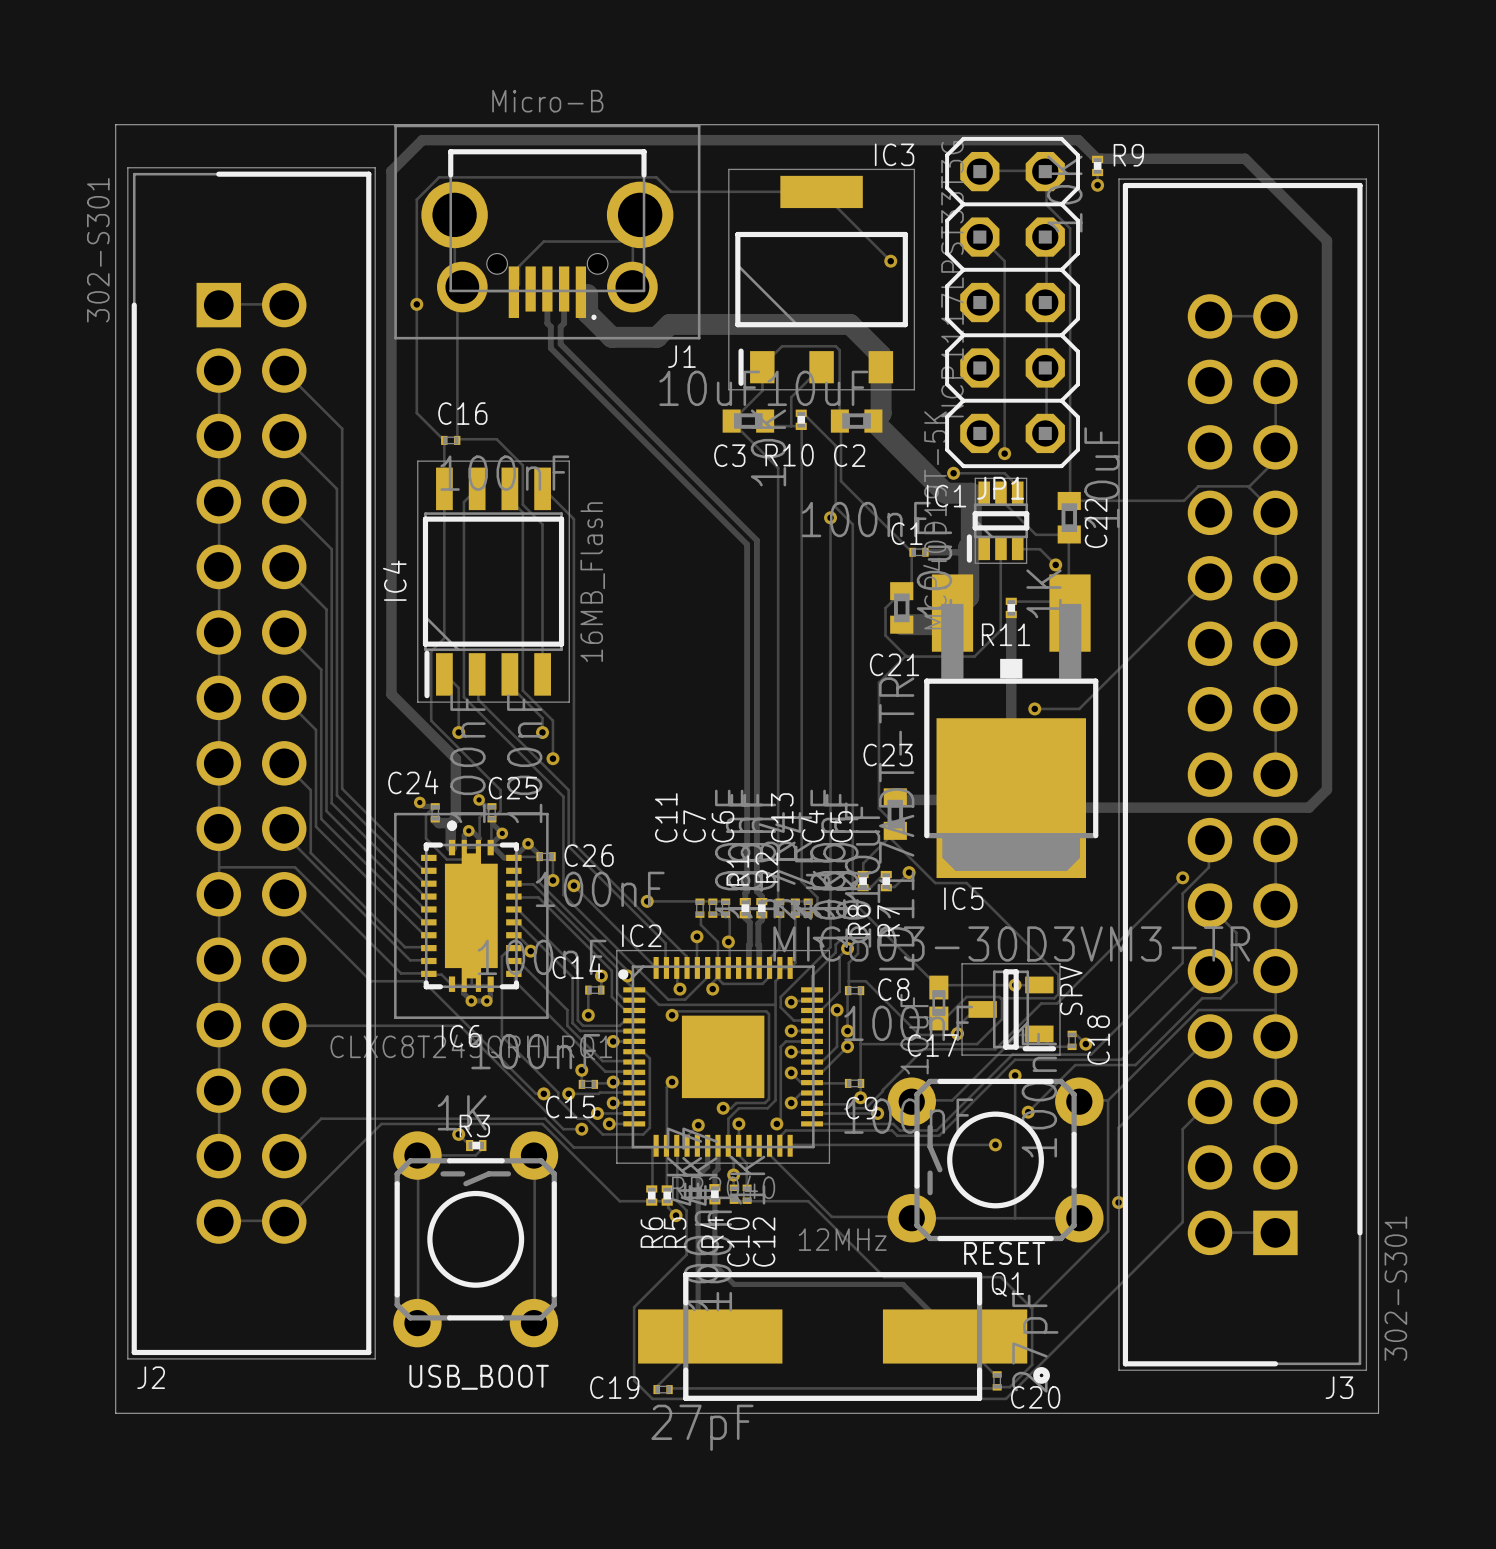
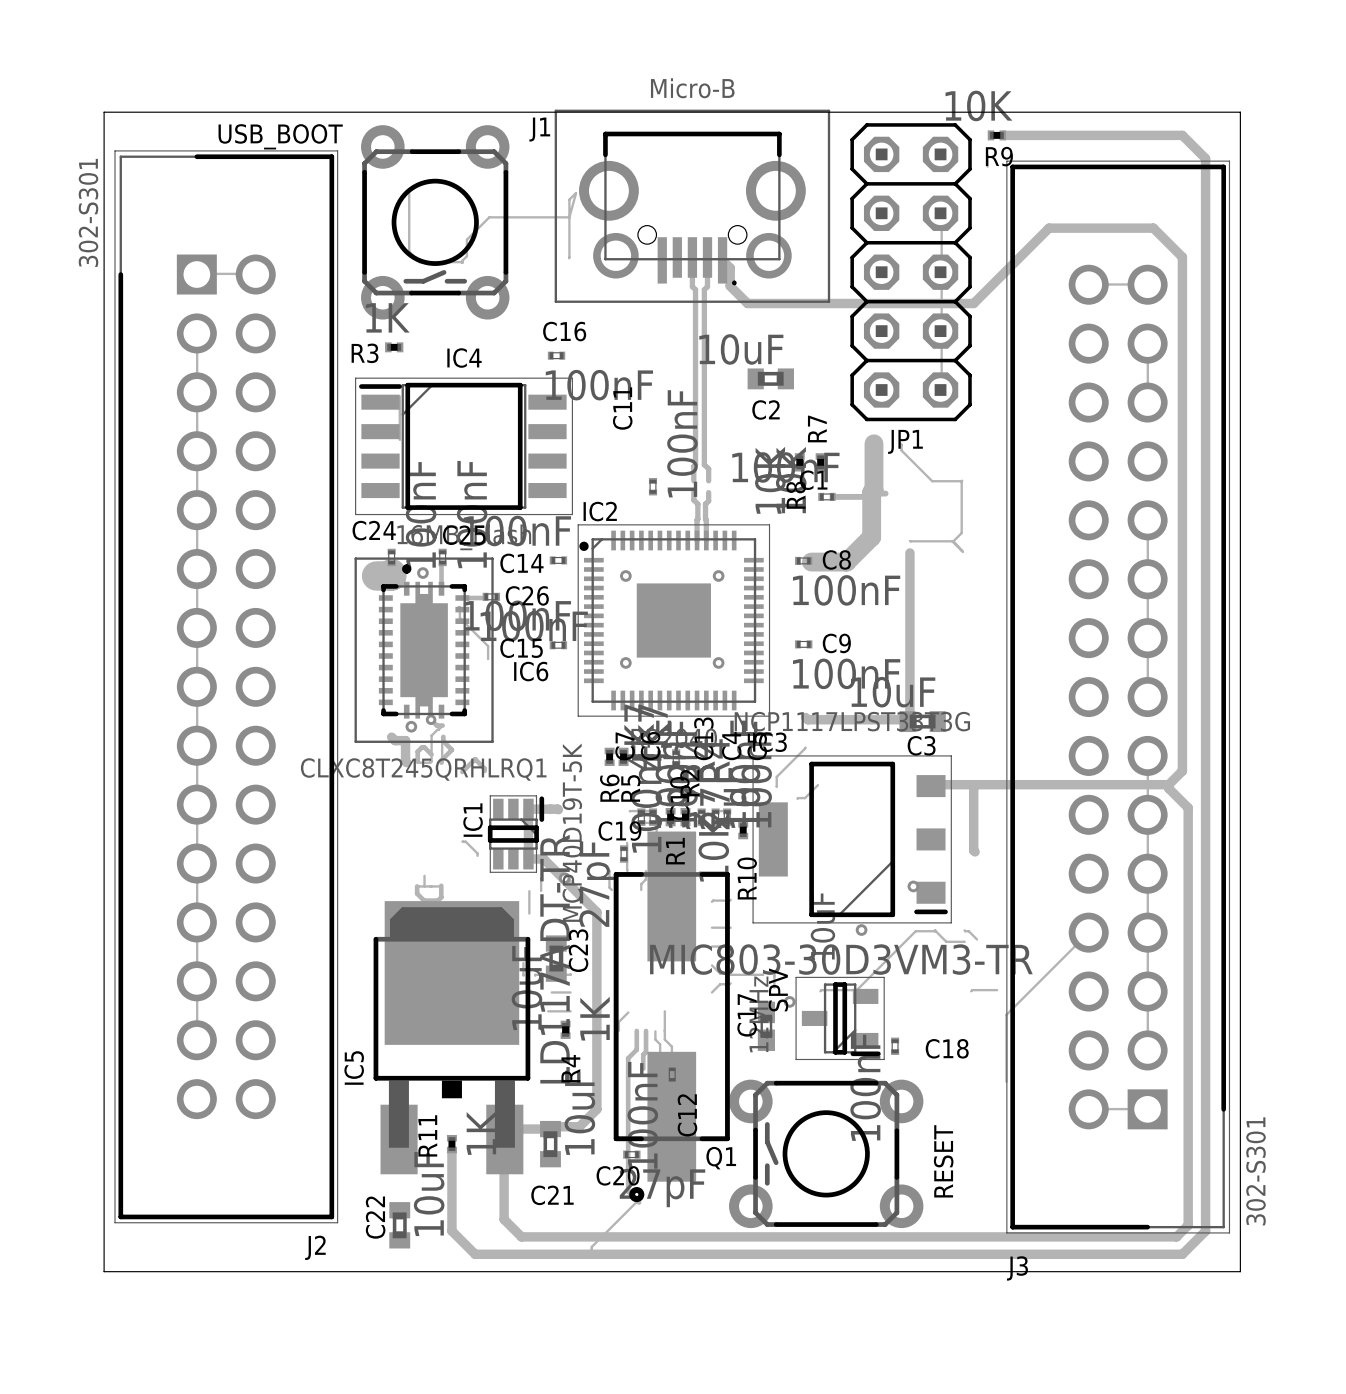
track: none -> (1002, 135) (1182, 135) (1205, 158) (1205, 1231) (1182, 1254) (475, 1254) (451, 1231) (451, 1150)
track: (1097, 158) (1245, 158) (1326, 240) (1326, 789) (1308, 807) (1020, 807) (1011, 798) -> none
track: (1101, 158) (1097, 159) (1078, 140) (422, 140) (391, 171) (391, 694) (455, 758) (455, 817) (450, 823) -> none
R9 rotation: 0° (1097, 165) -> 90° clockwise (996, 135)
R9 position: (1097, 165) -> (996, 135)
track: (979, 171) (1045, 170) (1046, 204) (1070, 228) (1069, 500) (1184, 500) (1198, 486) (1248, 486) (1275, 512) (1275, 578) -> none
via: (1097, 185) -> none
track: (821, 191) (670, 191) (656, 177) (439, 177) (416, 199) (416, 413) (444, 440) -> none
track: (821, 191) (890, 261) -> none
J1 position: (547, 232) -> (692, 206)
track: (979, 237) (1004, 261) (1004, 453) -> none
USB_BOOT: none -> (435, 222)
via: (890, 261) -> none
IC3 rotation: 0° (821, 279) -> 90° counterclockwise (852, 839)
IC3 position: (821, 279) -> (852, 839)
track: none -> (692, 255) (692, 286) (695, 289) (695, 464) (693, 466) (693, 480)
track: none -> (707, 255) (707, 286) (704, 289) (704, 464) (708, 468) (708, 480)
track: (462, 287) (457, 291) (457, 440) (496, 439) (522, 465) (522, 504) (542, 524) (542, 674) -> none
track: (547, 288) (547, 323) (550, 326) (550, 348) (747, 544) (747, 891) (745, 901) -> none
track: (564, 288) (564, 323) (560, 326) (560, 344) (756, 540) (756, 891) (761, 896) (761, 901) -> none
track: none -> (722, 260) (730, 268) (730, 286) (747, 303) (973, 303) (1049, 228) (1153, 228) (1182, 257) (1182, 771) (1168, 784)
track: (580, 292) (587, 294) (587, 313) (611, 337) (656, 337) (669, 324) (850, 324) (880, 355) (880, 367) -> none
via: (416, 304) -> none
J1 name position: J1 (681, 356) -> J1 (539, 129)
track: (821, 367) (791, 397) (791, 426) -> none
track: (881, 367) (881, 413) (873, 421) (945, 493) (984, 493) -> none
track: (284, 370) (342, 428) (342, 788) (423, 869) (428, 870) -> none
track: (801, 413) (835, 445) (835, 507) (852, 524) (852, 901) (938, 987) (937, 985) (1039, 984) -> none
R10 position: (801, 419) -> (743, 830)
track: (839, 420) (839, 350) (835, 346) (782, 346) (762, 365) (762, 390) (731, 421) (778, 468) (778, 898) (779, 901) (795, 901) -> none
C3 position: (748, 421) -> (922, 721)
track: (765, 421) (770, 426) (801, 427) (801, 881) (817, 897) (817, 906) (808, 915) (795, 914) (795, 962) (789, 968) (779, 967) (780, 976) (775, 981) (775, 1100) (767, 1108) (738, 1108) (728, 1118) (728, 1145) -> none
track: (839, 421) (841, 481) (912, 552) (911, 581) (885, 608) (885, 635) (906, 656) (974, 656) (1000, 630) (1000, 548) -> none
track: (284, 436) (336, 488) (336, 795) (424, 883) (428, 883) -> none
C16 position: (450, 440) -> (556, 355)
track: (1275, 447) (1274, 461) (1248, 487) -> none
via: (1004, 453) -> none
C3 name position: C3 (729, 455) -> C3 (921, 745)
R10 name rotation: 0° (789, 455) -> 90° counterclockwise (747, 878)
track: (953, 473) (1004, 473) (1016, 485) (1017, 493) -> none
via: (953, 473) -> none
track: (444, 488) (444, 638) (431, 651) (431, 720) (500, 790) (500, 811) (492, 818) -> none
track: (477, 488) (463, 502) (463, 697) (563, 796) (563, 894) (668, 999) (685, 999) (707, 977) (707, 968) -> none
track: (509, 488) (511, 500) (522, 512) (522, 690) (552, 720) (552, 758) -> none
track: (542, 488) (573, 519) (573, 843) (686, 956) (687, 967) -> none
track: (284, 501) (331, 549) (331, 803) (424, 896) (428, 896) -> none
track: (830, 517) (830, 947) (780, 996) (780, 1007) (793, 1020) (812, 1020) -> none
via: (830, 517) -> none
C22 position: (1069, 517) -> (399, 1225)
IC1 rotation: 0° (998, 520) -> 180° (516, 834)
IC1 position: (998, 520) -> (516, 834)
C22 name position: C22 (1096, 523) -> C22 (375, 1217)
track: none -> (693, 492) (693, 500) (697, 504) (697, 540)
track: none -> (708, 492) (708, 500) (705, 504) (706, 540)
track: (1017, 548) (1040, 549) (1055, 564) -> none
via: (1055, 564) -> none
track: (284, 566) (326, 609) (326, 811) (424, 909) (428, 909) -> none
track: (1209, 578) (1079, 708) (1034, 708) -> none
IC4 rotation: 0° (493, 581) -> 90° clockwise (464, 446)
C21 position: (901, 607) -> (550, 1144)
R11 position: (1011, 607) -> (451, 1144)
track: none -> (442, 563) (441, 588)
track: (284, 632) (321, 669) (321, 818) (424, 922) (428, 922) -> none
R11 name rotation: 0° (1006, 634) -> 90° counterclockwise (427, 1135)
via: none -> (422, 573)
track: none -> (391, 573) (391, 575) (376, 575)
via: none -> (625, 575)
via: none -> (718, 575)
track: (905, 655) (878, 682) (878, 808) (894, 824) (895, 830) (889, 837) (935, 883) (966, 883) (1058, 974) (1058, 994) (1054, 998) (1001, 998) -> none
track: none -> (485, 596) (462, 598)
C21 name position: C21 (894, 664) -> C21 (552, 1195)
track: (444, 674) (458, 687) (458, 732) -> none
track: (477, 674) (478, 699) (568, 790) (568, 846) (665, 943) (666, 967) -> none
track: (284, 697) (316, 729) (316, 826) (423, 934) (428, 935) -> none
via: (1034, 708) -> none
IC5 rotation: 0° (1011, 726) -> 180° (451, 1037)
IC5 position: (1011, 726) -> (451, 1037)
via: (458, 732) -> none
via: (542, 732) -> none
via: none -> (625, 662)
via: none -> (718, 662)
C23 name rotation: 0° (888, 755) -> 90° counterclockwise (578, 950)
via: (552, 758) -> none
track: (284, 763) (310, 790) (310, 852) (405, 947) (428, 948) -> none
track: (419, 802) (423, 806) (435, 806) (425, 814) (425, 838) (446, 859) (471, 858) -> none
via: (419, 802) -> none
via: none -> (411, 726)
C24 position: (435, 812) -> (391, 557)
C25 position: (491, 812) -> (442, 557)
C23 position: (895, 814) -> (556, 958)
track: (284, 828) (284, 834) (410, 960) (428, 961) -> none
via: (468, 830) -> none
via: (502, 833) -> none
track: (1209, 840) (1208, 867) (1182, 893) (1182, 962) (1091, 1054) (1012, 1054) (936, 1130) (899, 1130) (893, 1123) (812, 1123) -> none
via: (528, 843) -> none
track: (490, 847) (493, 847) (504, 857) (539, 856) (538, 881) (627, 970) (627, 982) (634, 989) (644, 990) (659, 1004) (775, 1004) -> none
C26 position: (546, 856) -> (491, 596)
track: (552, 856) (552, 880) -> none
track: (219, 867) (295, 867) (401, 973) (441, 974) (452, 985) (463, 985) -> none
R1 name position: R1 (737, 870) -> R1 (675, 851)
via: (909, 872) -> none
track: none -> (973, 784) (975, 851)
track: none -> (1168, 784) (931, 786)
track: none -> (1168, 784) (1168, 788) (1188, 807) (1188, 1225) (1176, 1236) (521, 1236) (504, 1219) (504, 1120) (512, 1129) (579, 1126) (596, 1109) (596, 912) (543, 859) (528, 859) (528, 809) (558, 809)
track: (886, 874) (882, 875) (871, 886) (863, 887) -> none
track: (1182, 877) (1057, 1003) (1041, 1003) (995, 1049) (923, 1049) (865, 1108) (855, 1108) (851, 1104) (812, 1103) -> none
via: (1182, 877) -> none
via: (552, 880) -> none
R8 position: (863, 881) -> (799, 462)
R7 position: (886, 881) -> (820, 462)
track: (513, 883) (533, 884) (617, 968) (617, 993) (623, 999) (634, 1000) -> none
track: (573, 885) (656, 967) -> none
via: (573, 885) -> none
track: (284, 894) (370, 981) (423, 981) (535, 1093) (543, 1093) -> none
track: (513, 896) (538, 897) (611, 970) (611, 996) (624, 1010) (634, 1010) -> none
IC5 name position: IC5 (963, 898) -> IC5 (354, 1068)
track: (647, 901) (699, 901) -> none
via: (647, 901) -> none
track: (1209, 905) (1236, 932) (1236, 982) (1220, 998) (1202, 998) (1135, 1065) (1075, 1065) (1028, 1112) -> none
C11 position: (699, 908) -> (652, 486)
track: (513, 909) (518, 910) (577, 969) (577, 1020) (583, 1025) (619, 1025) (623, 1021) (634, 1020) -> none
track: (699, 914) (700, 924) (717, 941) (717, 978) (723, 983) (762, 983) (768, 977) (770, 957) (779, 948) (779, 914) -> none
track: (745, 914) (745, 917) (749, 922) (748, 967) -> none
track: (761, 914) (761, 920) (758, 923) (759, 967) -> none
IC6 position: (471, 915) -> (424, 650)
R7 name position: R7 (888, 920) -> R7 (817, 428)
track: (513, 922) (517, 922) (572, 977) (572, 1023) (580, 1031) (634, 1031) -> none
via: (696, 936) -> none
via: (728, 941) -> none
track: (513, 948) (509, 948) (501, 956) (501, 1036) (558, 1092) (558, 1099) (577, 1118) (587, 1118) (602, 1134) (643, 1134) (649, 1127) (649, 1058) (643, 1051) (634, 1051) -> none
track: (847, 948) (839, 956) (839, 991) (821, 1010) (812, 1010) -> none
via: (847, 948) -> none
via: (530, 951) -> none
track: (513, 961) (518, 961) (567, 1010) (567, 1025) (602, 1061) (634, 1062) -> none
C14 name position: C14 (577, 967) -> C14 (521, 563)
track: (1209, 971) (1121, 1059) (1015, 1059) (939, 1135) (897, 1135) (892, 1130) (786, 1130) (780, 1135) (779, 1145) -> none
track: (513, 973) (515, 981) (605, 1071) (634, 1072) -> none
via: (601, 976) -> none
track: (848, 981) (865, 981) (919, 1034) (949, 1034) (974, 1010) (982, 1009) -> none
via: (679, 989) -> none
via: (712, 989) -> none
track: (812, 989) (812, 976) (835, 952) (835, 944) (842, 938) (852, 938) (858, 943) (858, 953) (848, 962) (847, 1031) -> none
C14 position: (594, 990) -> (558, 560)
C8 position: (854, 990) -> (803, 560)
track: (861, 990) (860, 1083) -> none
SPV name position: SPV (1071, 990) -> SPV (778, 989)
via: (471, 1000) -> none
via: (486, 1000) -> none
via: (791, 1002) -> none
C17 position: (938, 1003) -> (766, 1026)
SPV position: (1011, 1009) -> (840, 1018)
track: (837, 1010) (837, 1046) (822, 1061) (812, 1062) -> none
via: (837, 1010) -> none
track: (1275, 1010) (1198, 1010) (1108, 1100) (1108, 1231) (1031, 1307) -> none
via: (588, 1015) -> none
track: (672, 1015) (676, 1011) (766, 1011) (768, 1013) (768, 1099) (765, 1103) (736, 1103) (731, 1108) (723, 1108) -> none
via: (672, 1015) -> none
track: (938, 1018) (945, 1017) (966, 996) (999, 996) (1002, 999) (1002, 1019) (977, 1044) (860, 1044) -> none
track: (284, 1025) (460, 1025) (563, 1129) (581, 1129) -> none
via: (791, 1031) -> none
via: (847, 1031) -> none
IC6 name position: IC6 (461, 1036) -> IC6 (531, 671)
C18 position: (1072, 1040) -> (895, 1046)
C18 name rotation: 0° (1098, 1040) -> 90° clockwise (947, 1048)
via: (613, 1041) -> none
track: (812, 1041) (786, 1041) (780, 1046) (780, 1120) (776, 1123) -> none
via: (1085, 1044) -> none
C17 name rotation: 0° (932, 1045) -> 90° counterclockwise (747, 1015)
C17 name position: C17 (932, 1045) -> C17 (747, 1015)
track: (847, 1046) (822, 1071) (812, 1072) -> none
via: (847, 1046) -> none
via: (791, 1051) -> none
IC2 position: (723, 1056) -> (673, 620)
via: (581, 1070) -> none
via: (791, 1072) -> none
track: (1015, 1075) (1015, 1218) -> none
via: (1015, 1075) -> none
via: (613, 1082) -> none
track: (672, 1082) (666, 1087) (667, 1188) -> none
via: (672, 1082) -> none
C9 position: (854, 1083) -> (803, 644)
C15 position: (588, 1084) -> (558, 645)
track: (634, 1092) (568, 1093) -> none
via: (543, 1093) -> none
via: (568, 1093) -> none
via: (860, 1097) -> none
track: (1209, 1101) (1182, 1129) (1182, 1222) (1005, 1398) (652, 1398) (634, 1380) (634, 1307) (686, 1254) (686, 1210) (677, 1201) (676, 1145) -> none
via: (613, 1103) -> none
via: (791, 1103) -> none
C15 name position: C15 (570, 1106) -> C15 (521, 648)
via: (723, 1108) -> none
C9 name position: C9 (861, 1108) -> C9 (836, 643)
via: (1028, 1112) -> none
track: (597, 1113) (634, 1113) -> none
via: (597, 1113) -> none
track: (812, 1113) (877, 1113) -> none
via: (609, 1123) -> none
via: (738, 1123) -> none
via: (776, 1123) -> none
R3 name position: R3 (474, 1125) -> R3 (365, 353)
via: (698, 1125) -> none
via: (581, 1129) -> none
via: (458, 1134) -> none
track: (995, 1144) (790, 1145) -> none
via: (995, 1144) -> none
R3 position: (476, 1145) -> (394, 347)
track: (482, 1145) (475, 1155) (417, 1155) (417, 1323) -> none
track: (656, 1145) (652, 1148) (651, 1188) -> none
track: (769, 1145) (770, 1155) (831, 1216) (1079, 1218) -> none
track: (653, 1148) (573, 1147) (545, 1118) (321, 1118) (284, 1156) -> none
track: (533, 1155) (533, 1323) -> none
RESET position: (995, 1159) -> (826, 1153)
via: (733, 1175) -> none
R4 position: (714, 1194) -> (565, 1029)
C10 position: (734, 1194) -> (676, 758)
R6 position: (651, 1195) -> (609, 756)
R5 position: (667, 1195) -> (623, 756)
track: (714, 1200) (714, 1265) (734, 1284) (903, 1284) (994, 1374) (997, 1374) -> none
track: (734, 1200) (808, 1201) (884, 1277) (1000, 1277) (1032, 1308) (1032, 1364) (1009, 1387) (996, 1388) (669, 1389) -> none
via: (1118, 1202) -> none
track: (676, 1215) (668, 1207) (666, 1201) (619, 1201) (542, 1123) (381, 1123) (284, 1221) (218, 1221) -> none
via: (676, 1215) -> none
R4 name position: R4 (711, 1232) -> R4 (570, 1068)
USB_BOOT: (475, 1239) -> none
RESET name rotation: 0° (1004, 1253) -> 90° counterclockwise (943, 1161)
Q1 rotation: 0° (844, 1336) -> 90° clockwise (671, 1016)
J2 name position: J2 (151, 1377) -> J2 (315, 1247)
C20 rotation: 0° (997, 1380) -> 90° clockwise (631, 1154)
C20 position: (997, 1380) -> (631, 1154)
J3 name position: J3 (1339, 1387) -> J3 (1017, 1268)
C19 rotation: 0° (663, 1389) -> 90° clockwise (624, 854)
C19 position: (663, 1389) -> (624, 854)

